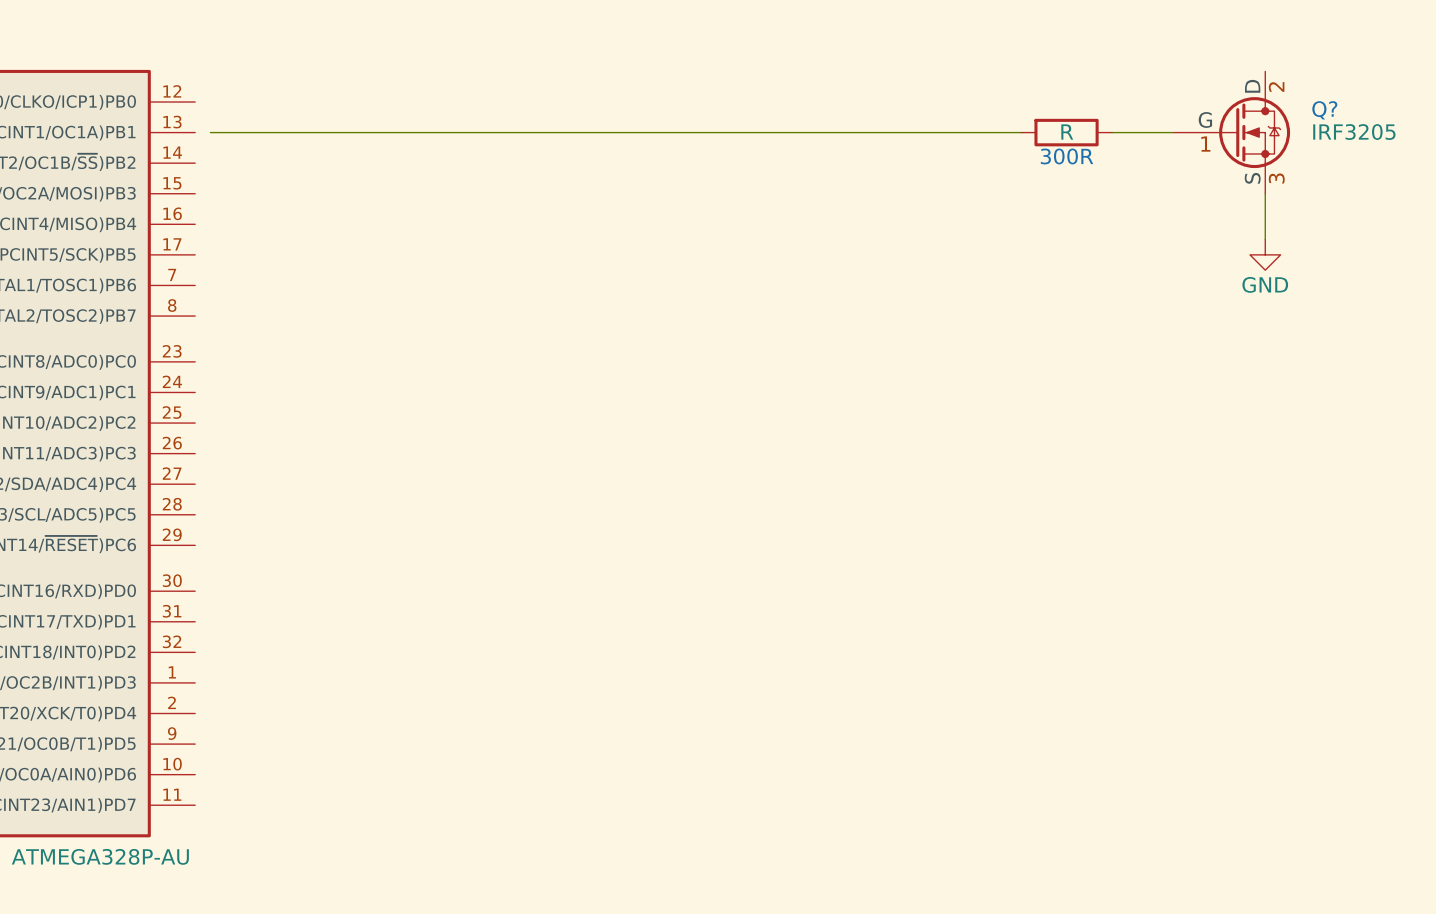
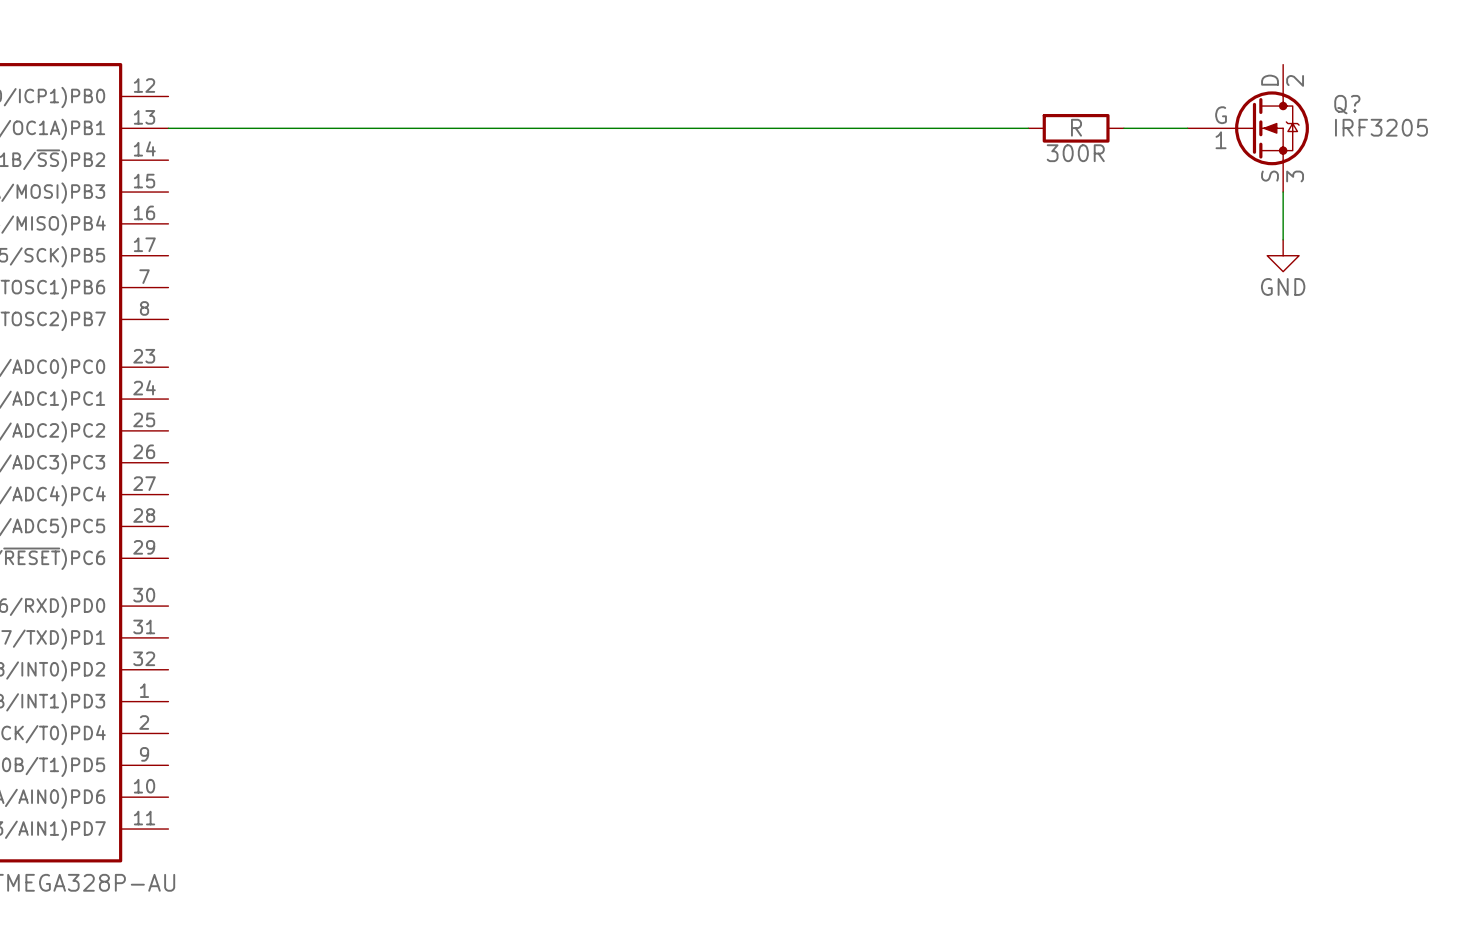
wire: none -> (168, 128) (184, 128)

